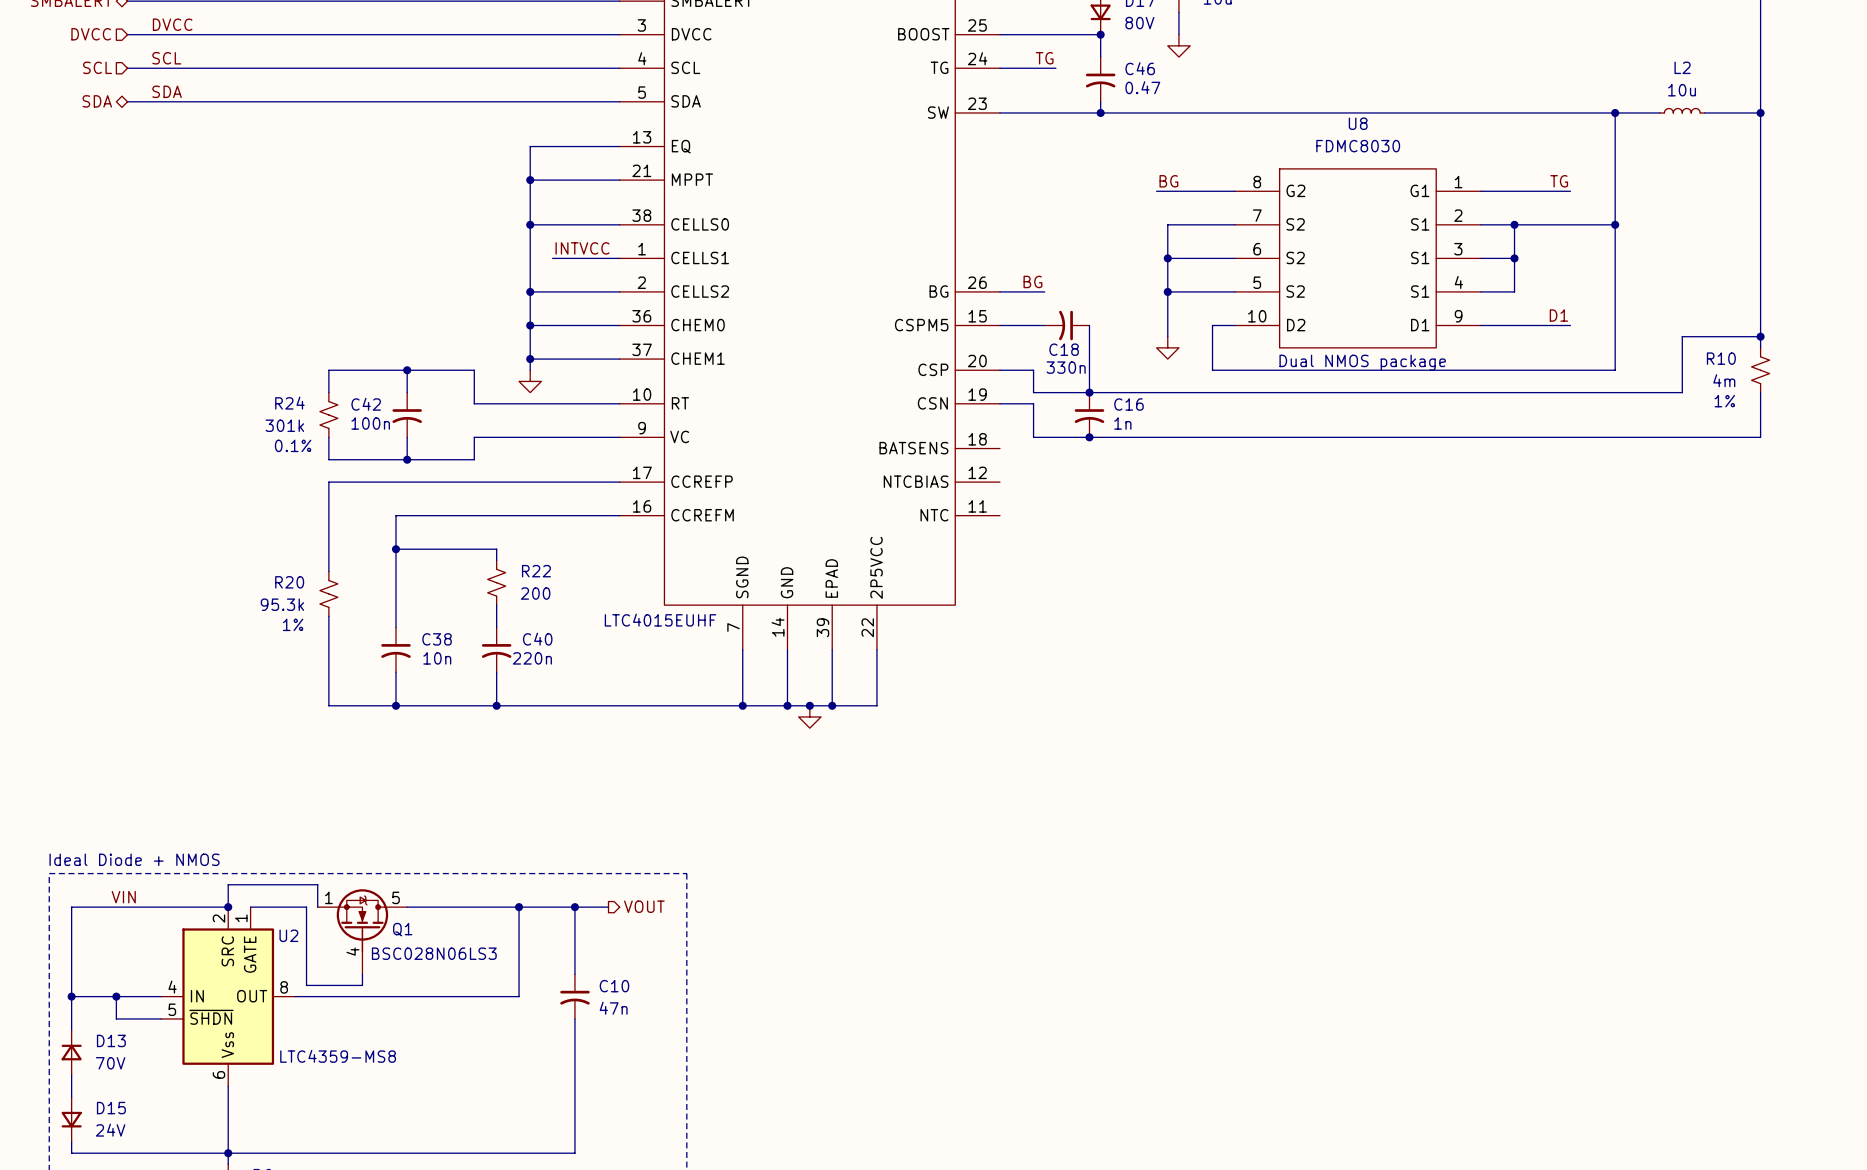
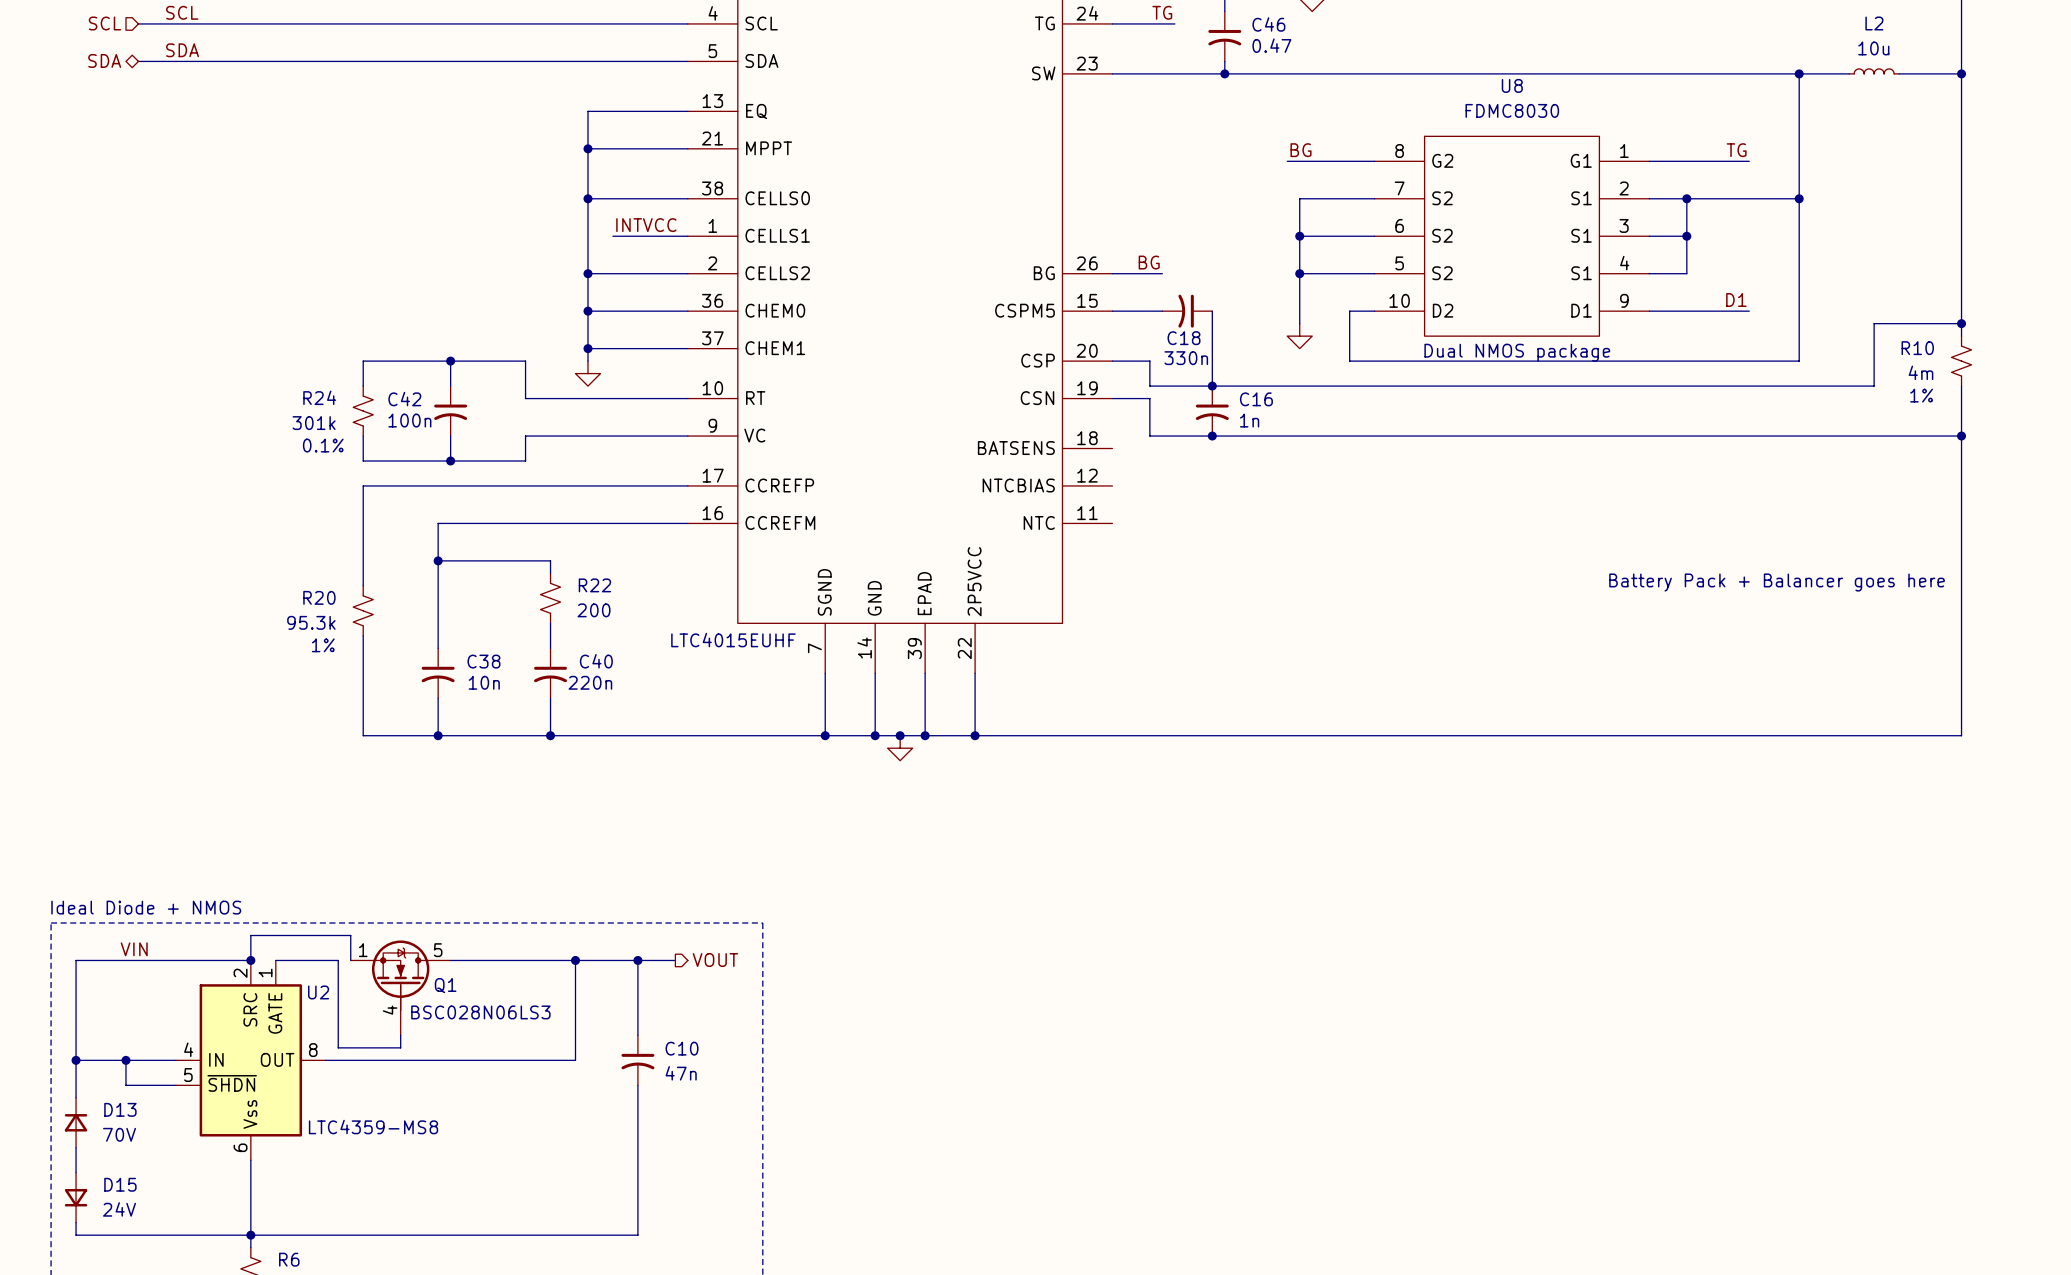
wire: none -> (1961, 436) (1961, 735) (975, 735)
junction: none -> (1961, 436)
text: none -> Battery Pack + Balancer goes here (1777, 582)
junction: none -> (975, 735)

